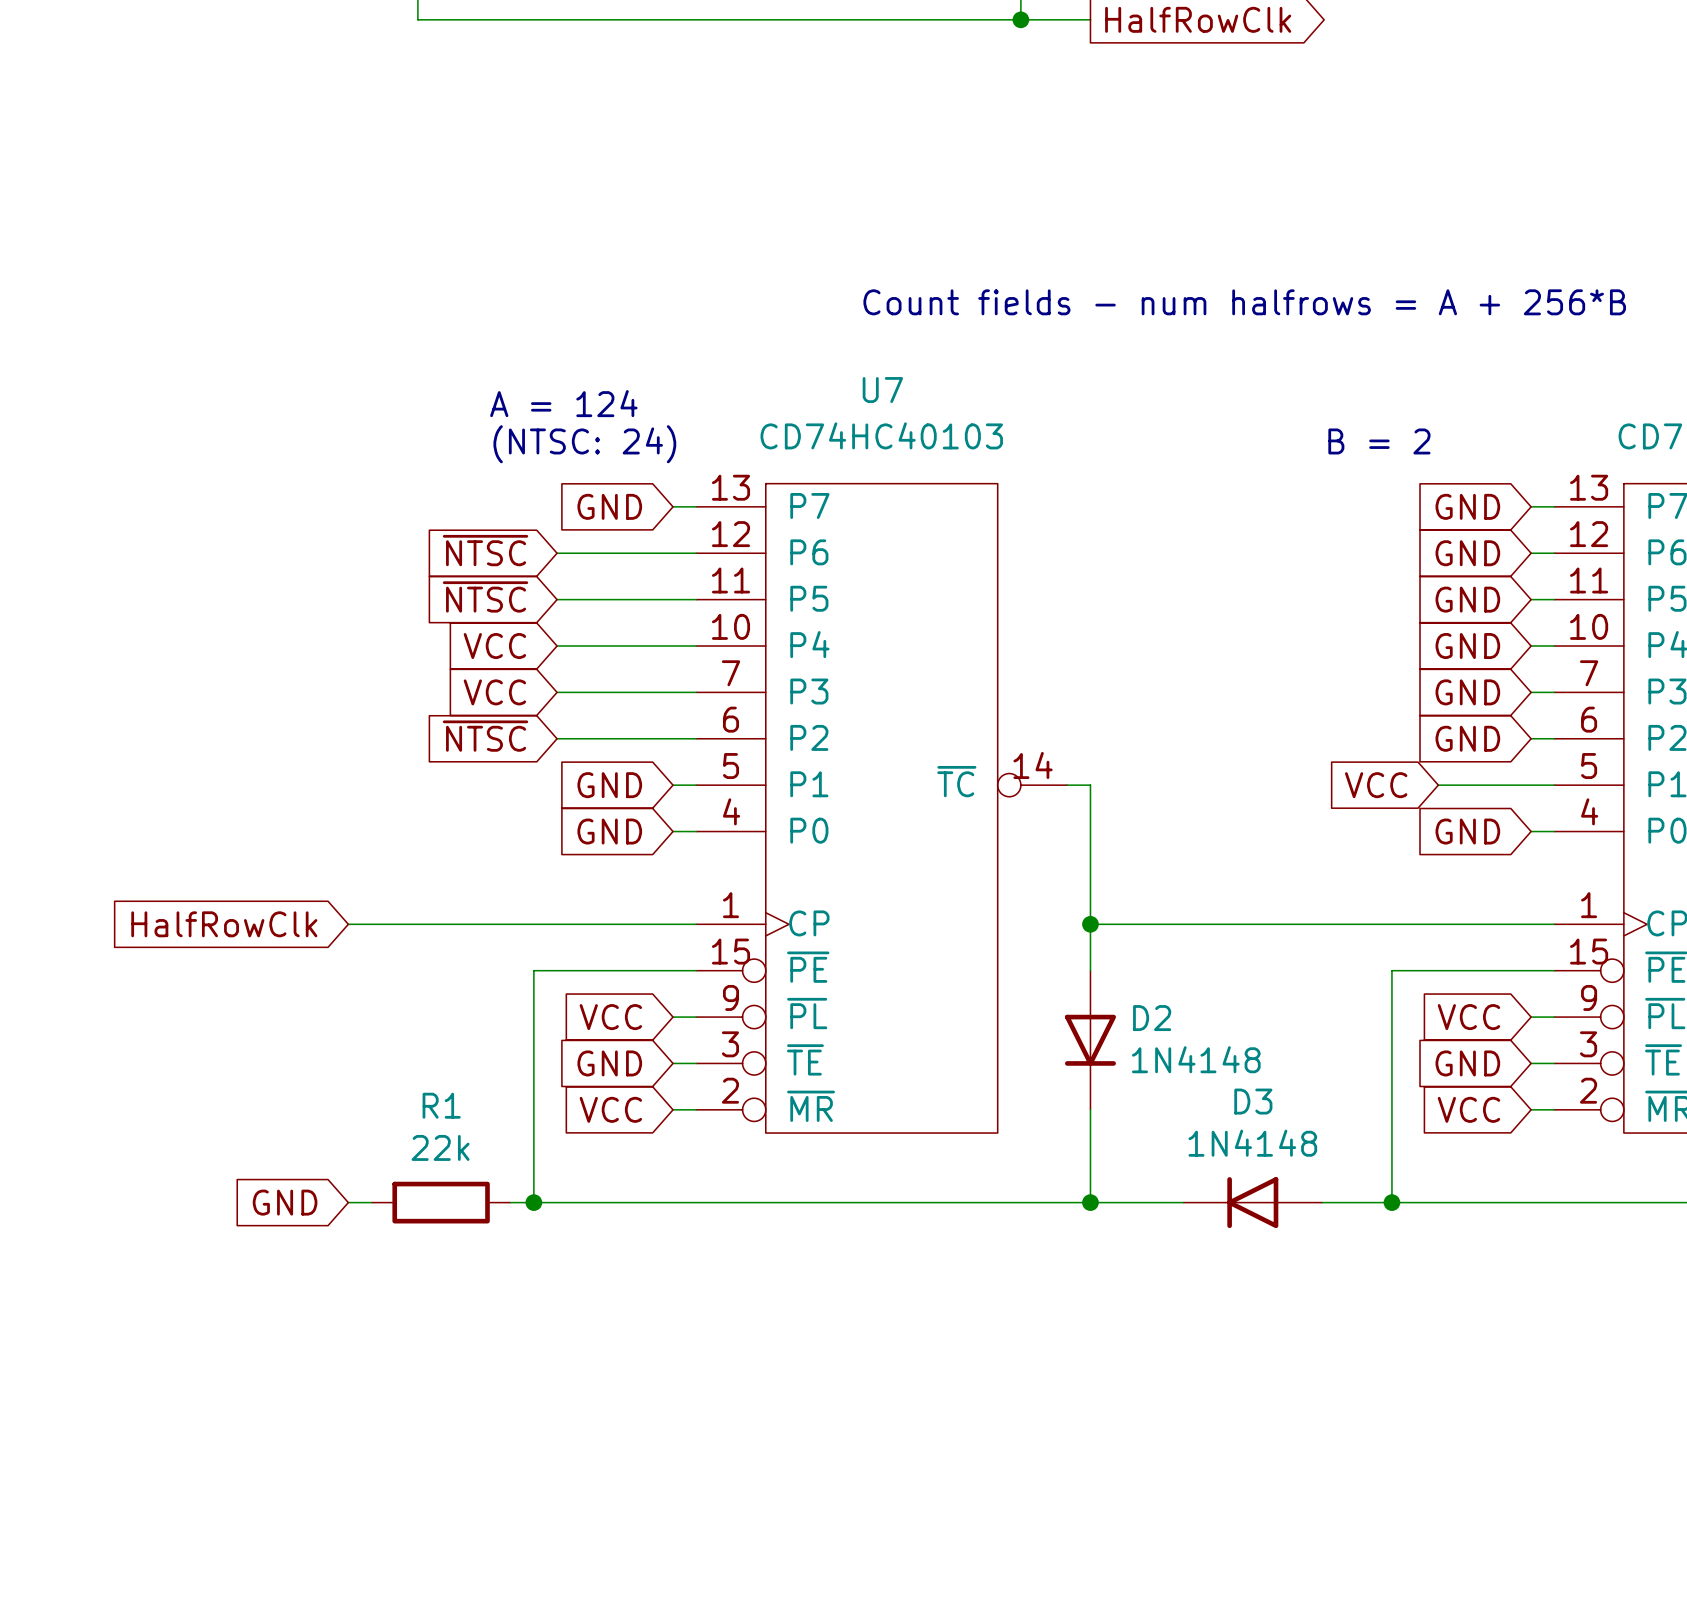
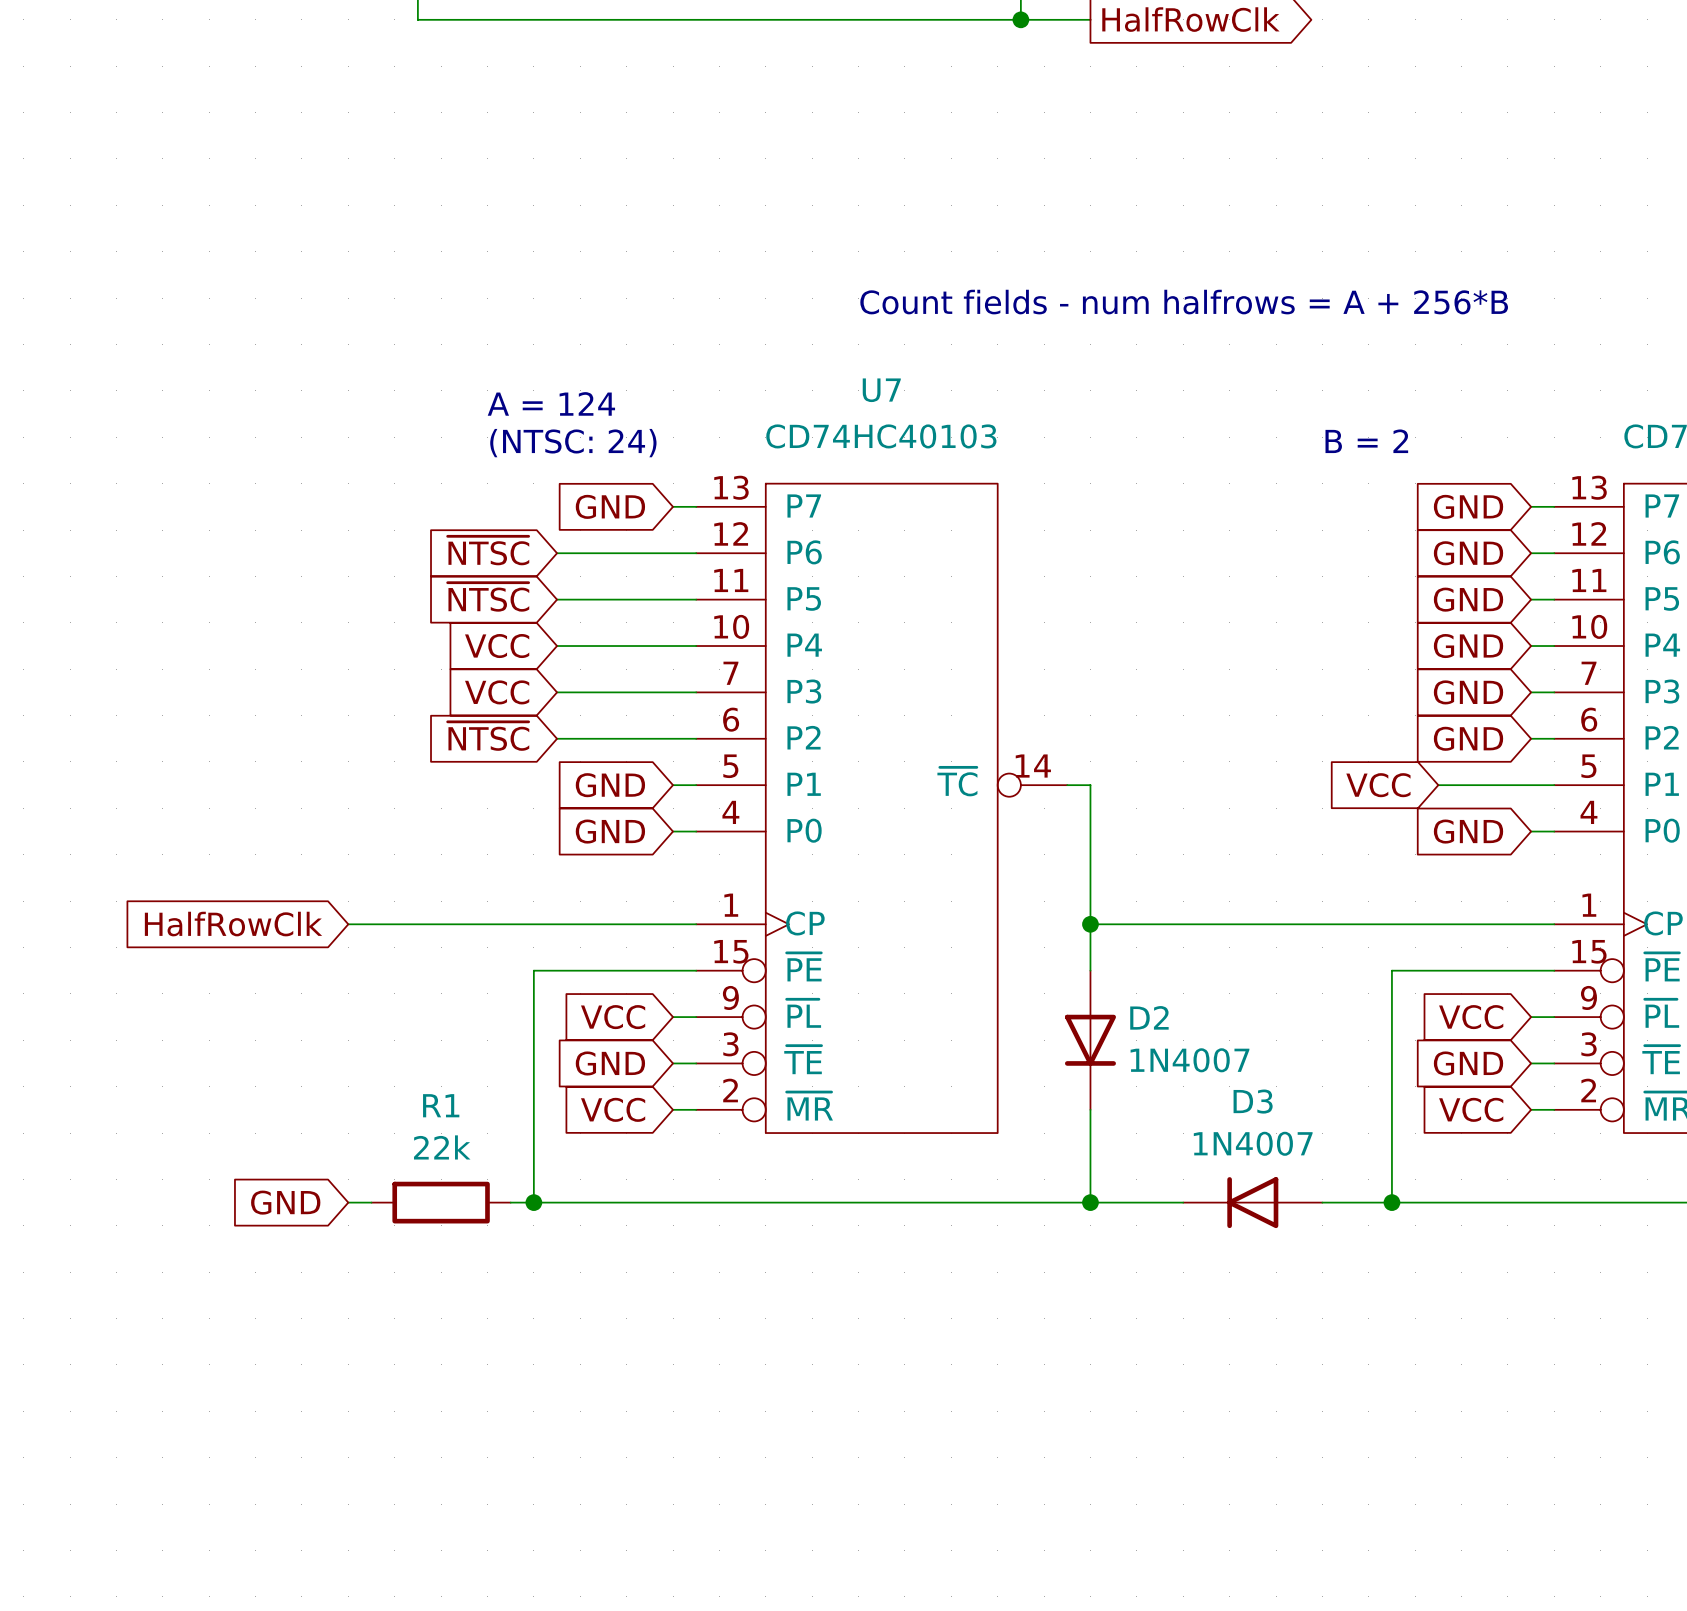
D2 value: 1N4148 (1196, 1059) -> 1N4007 (1189, 1060)
D3 value: 1N4148 (1252, 1143) -> 1N4007 (1253, 1143)

